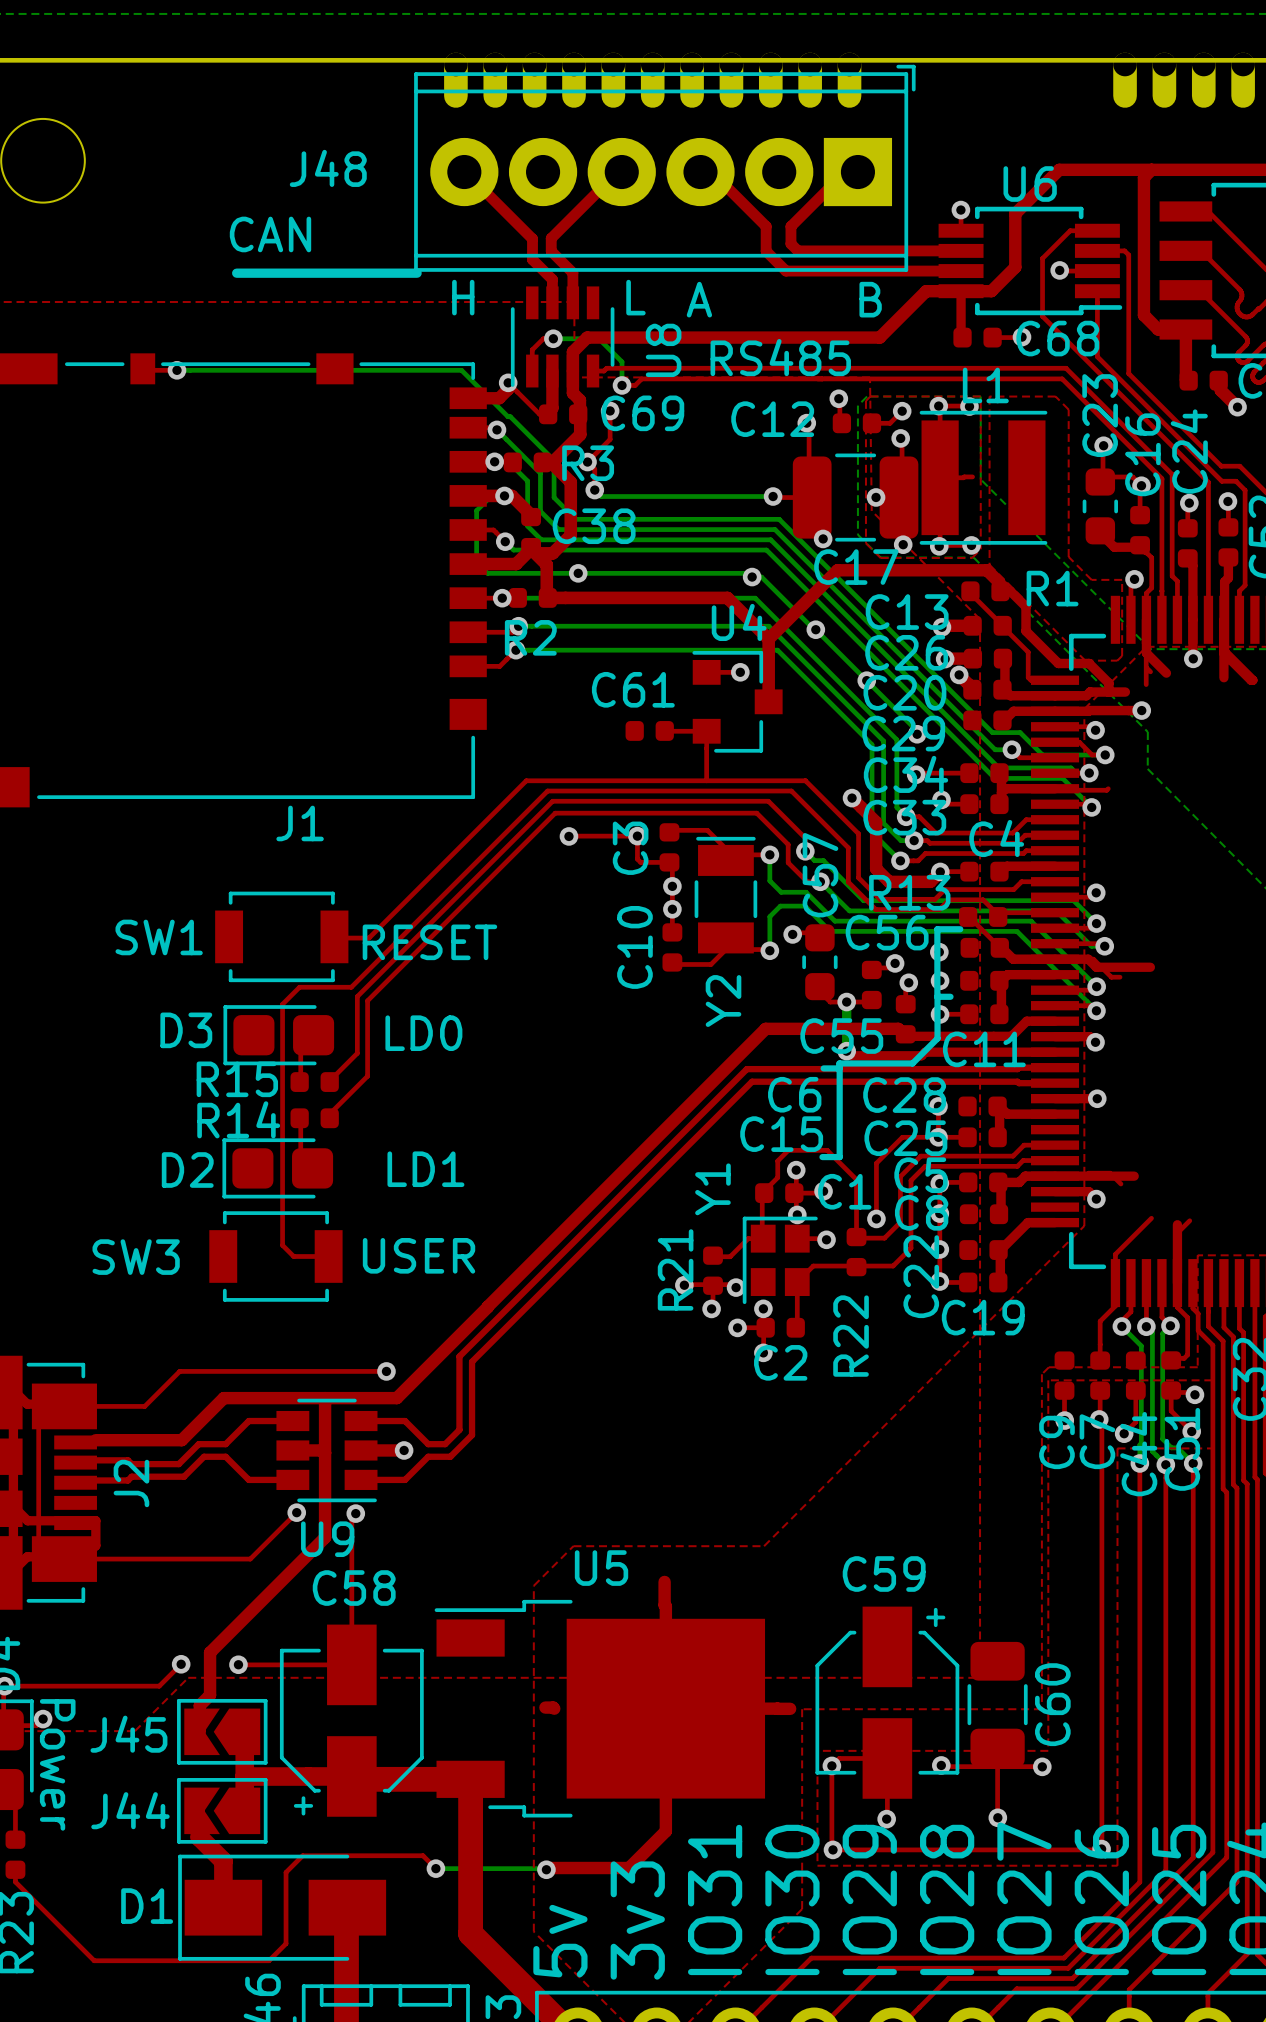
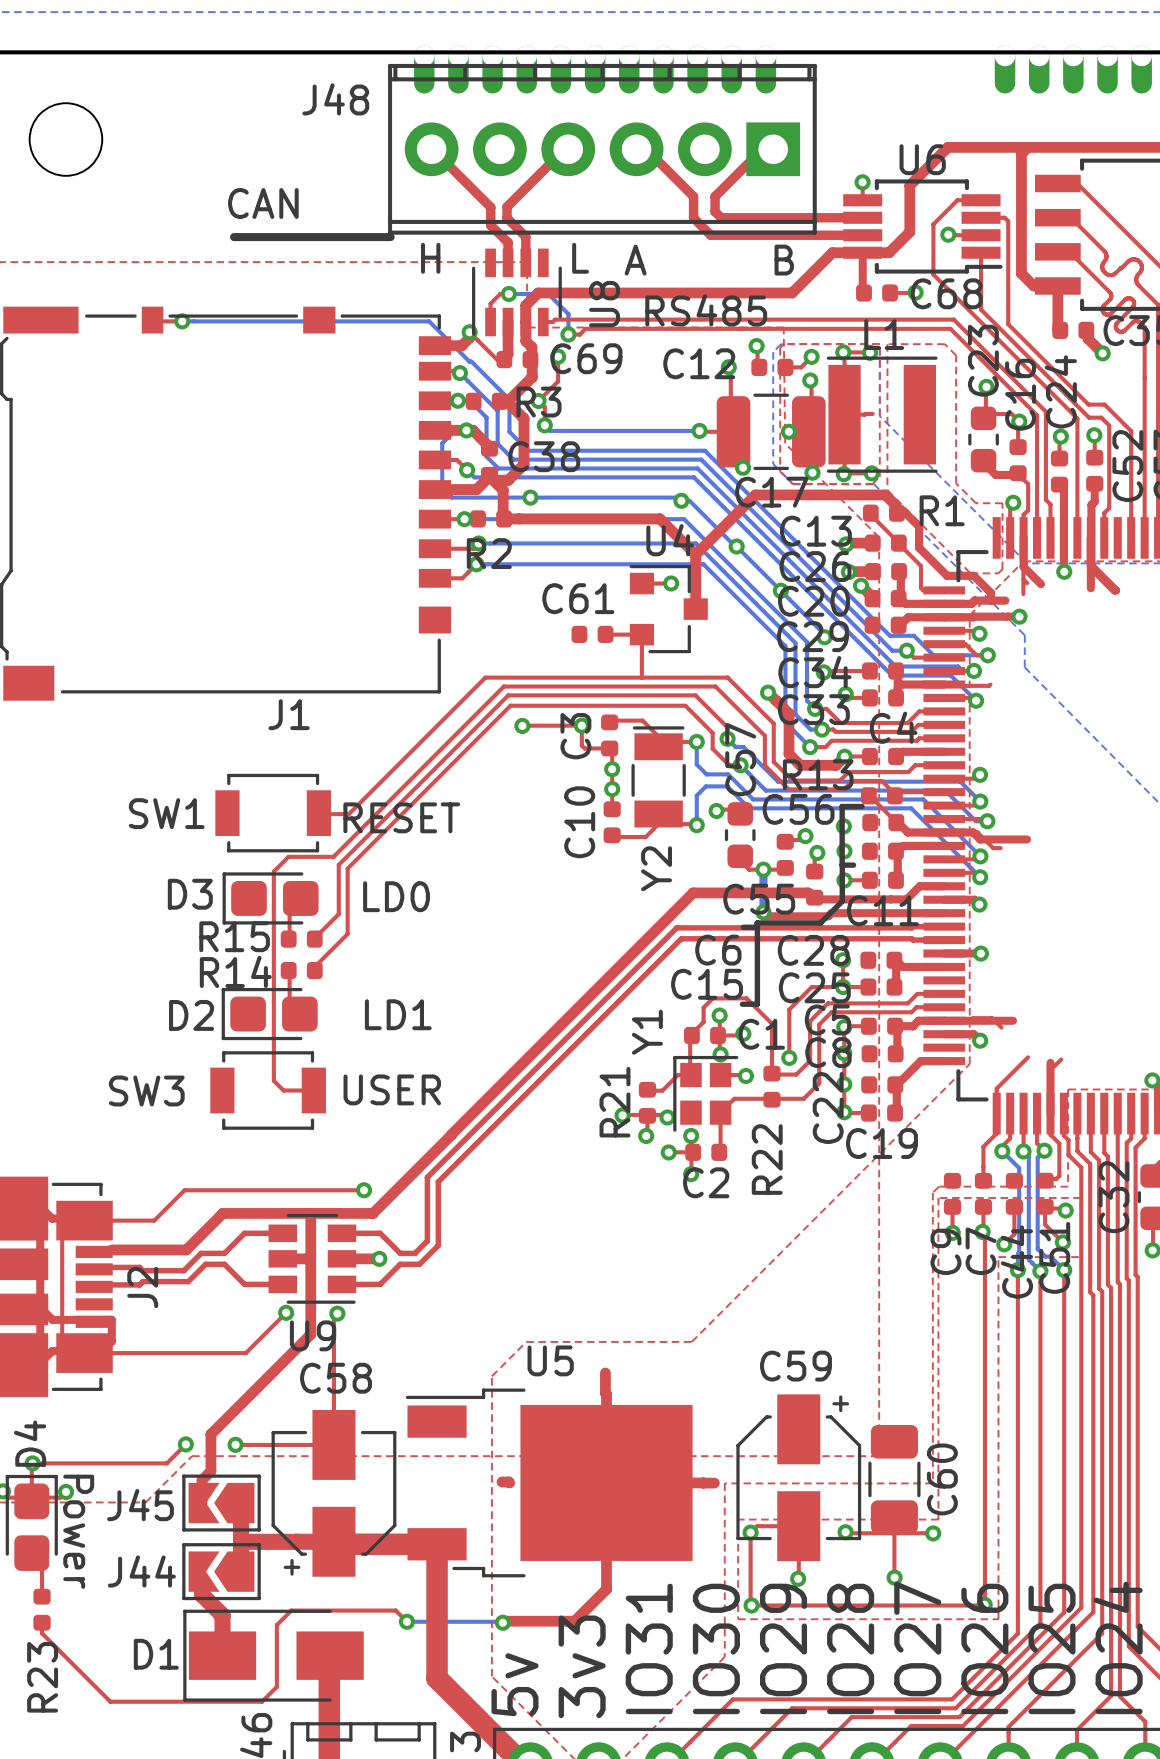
J48 footprint: [414, 64, 916, 272] -> [387, 63, 817, 235]
J48 name position: J48 (328, 168) -> J48 (335, 99)

